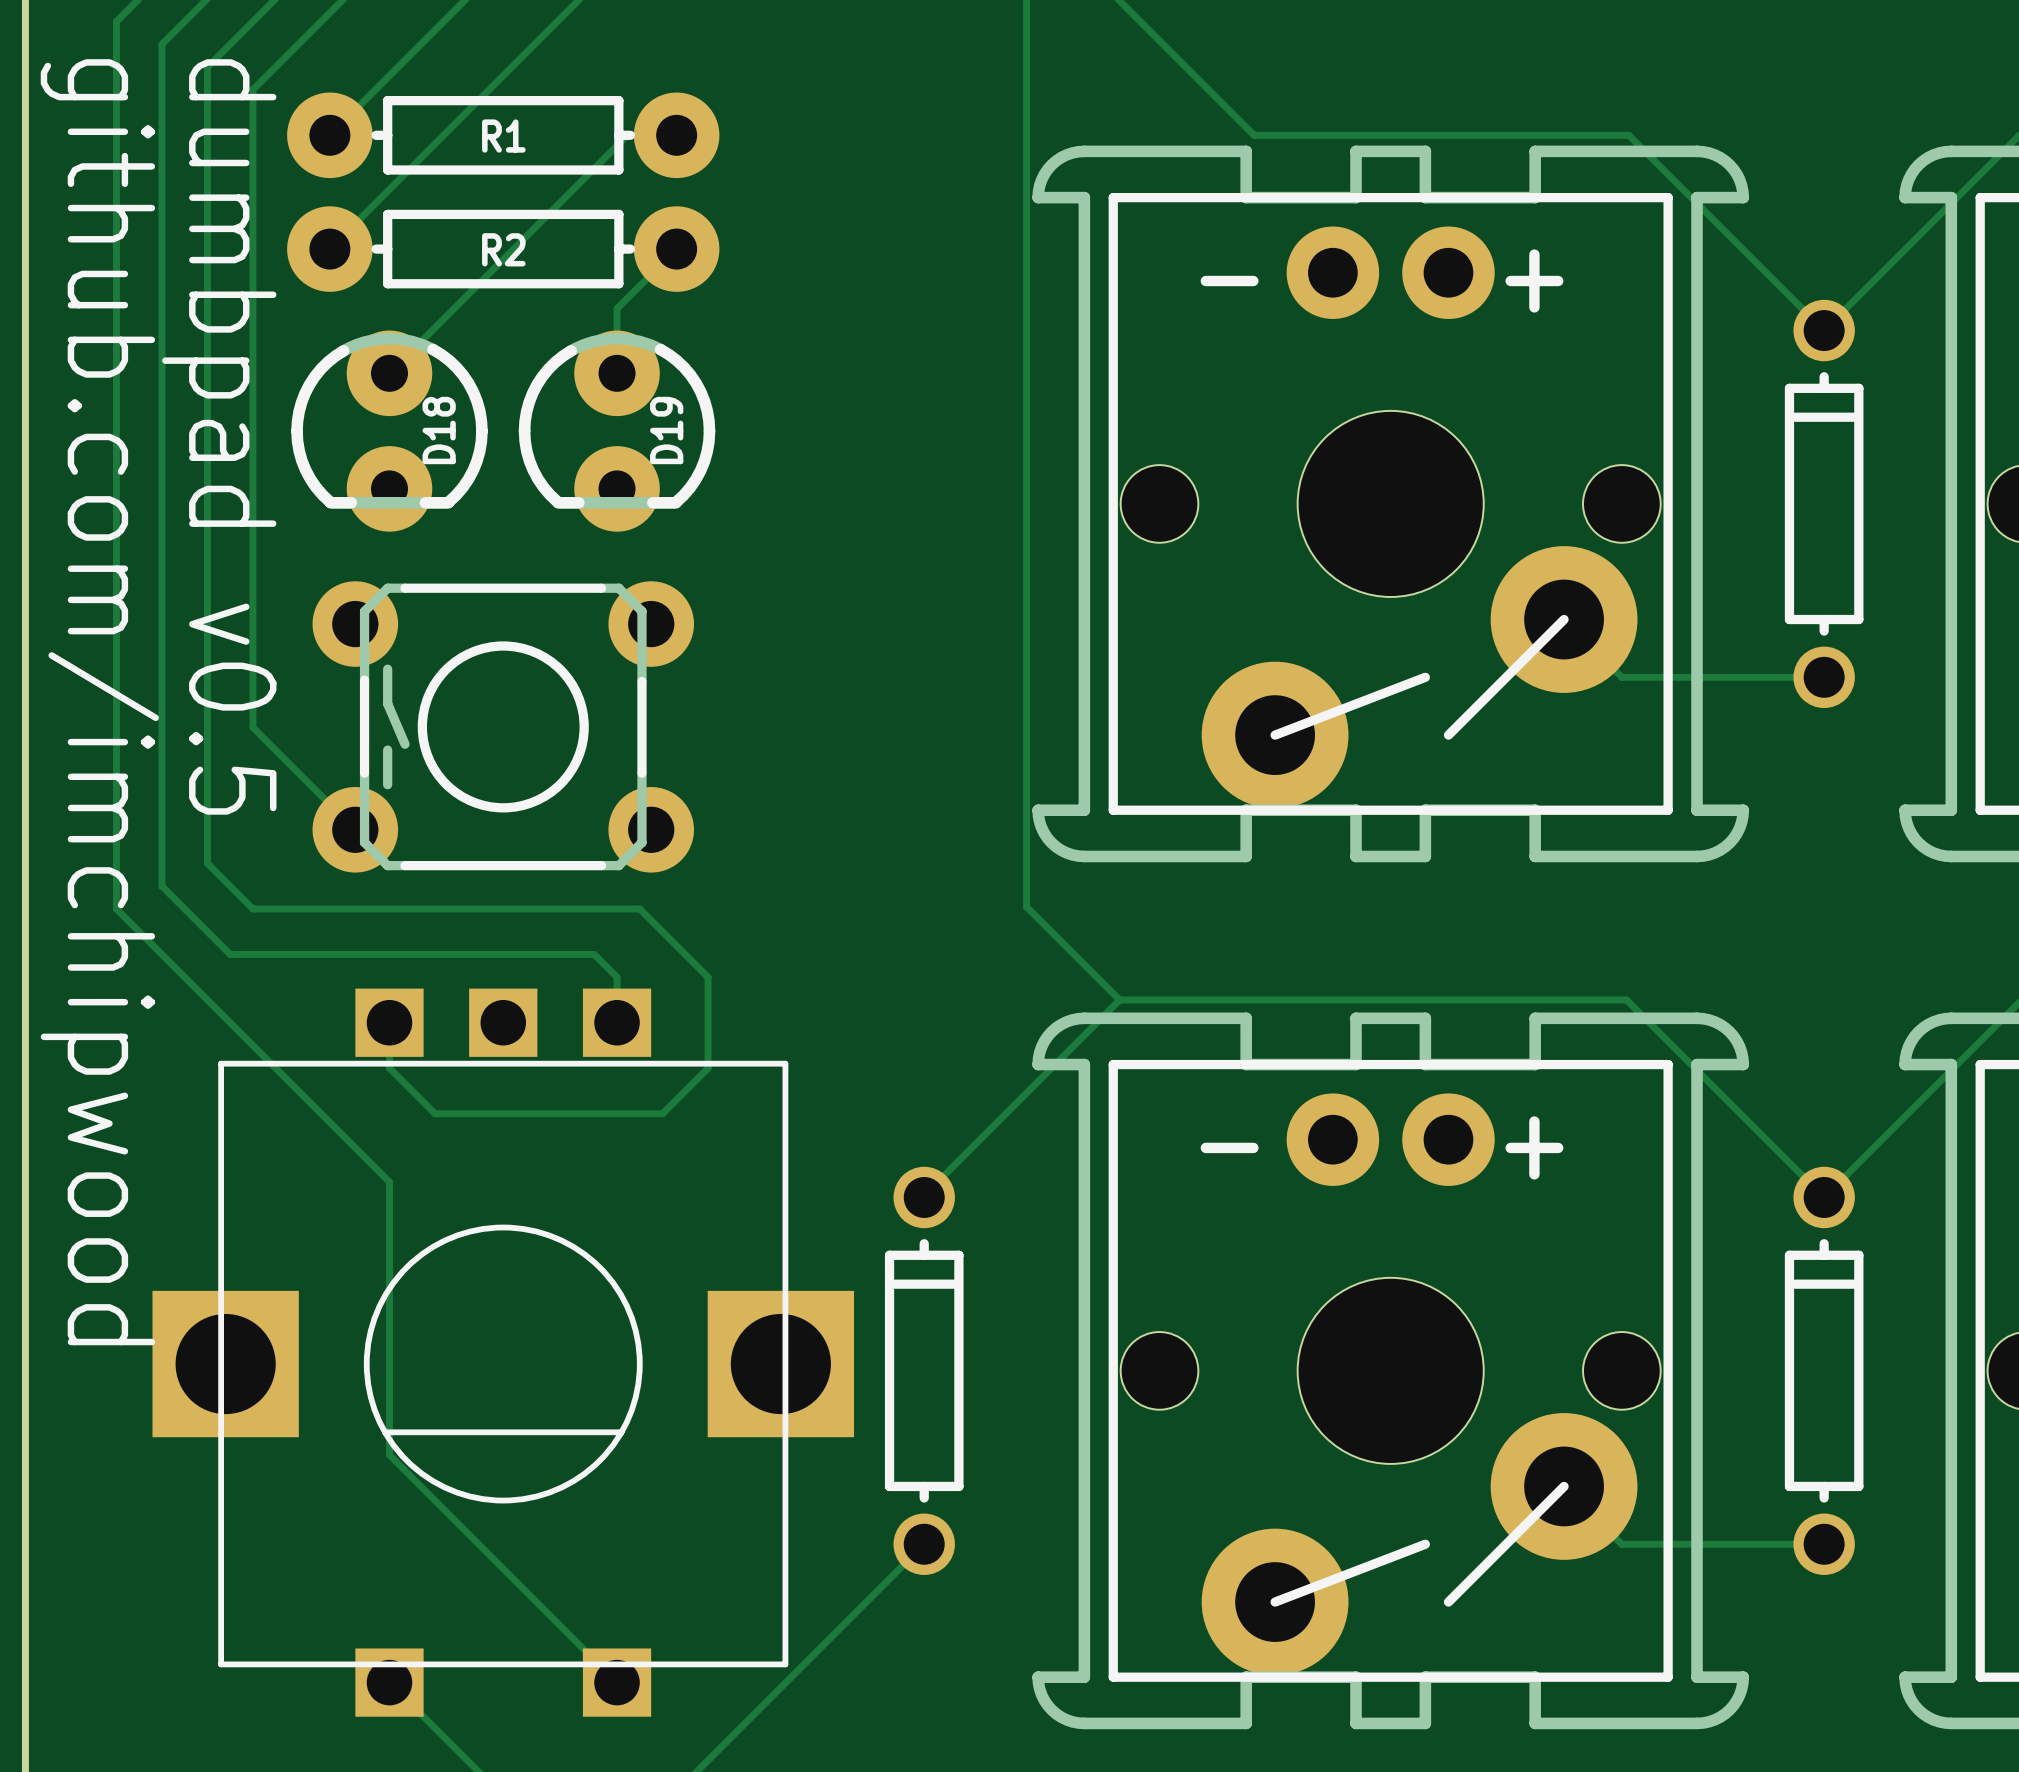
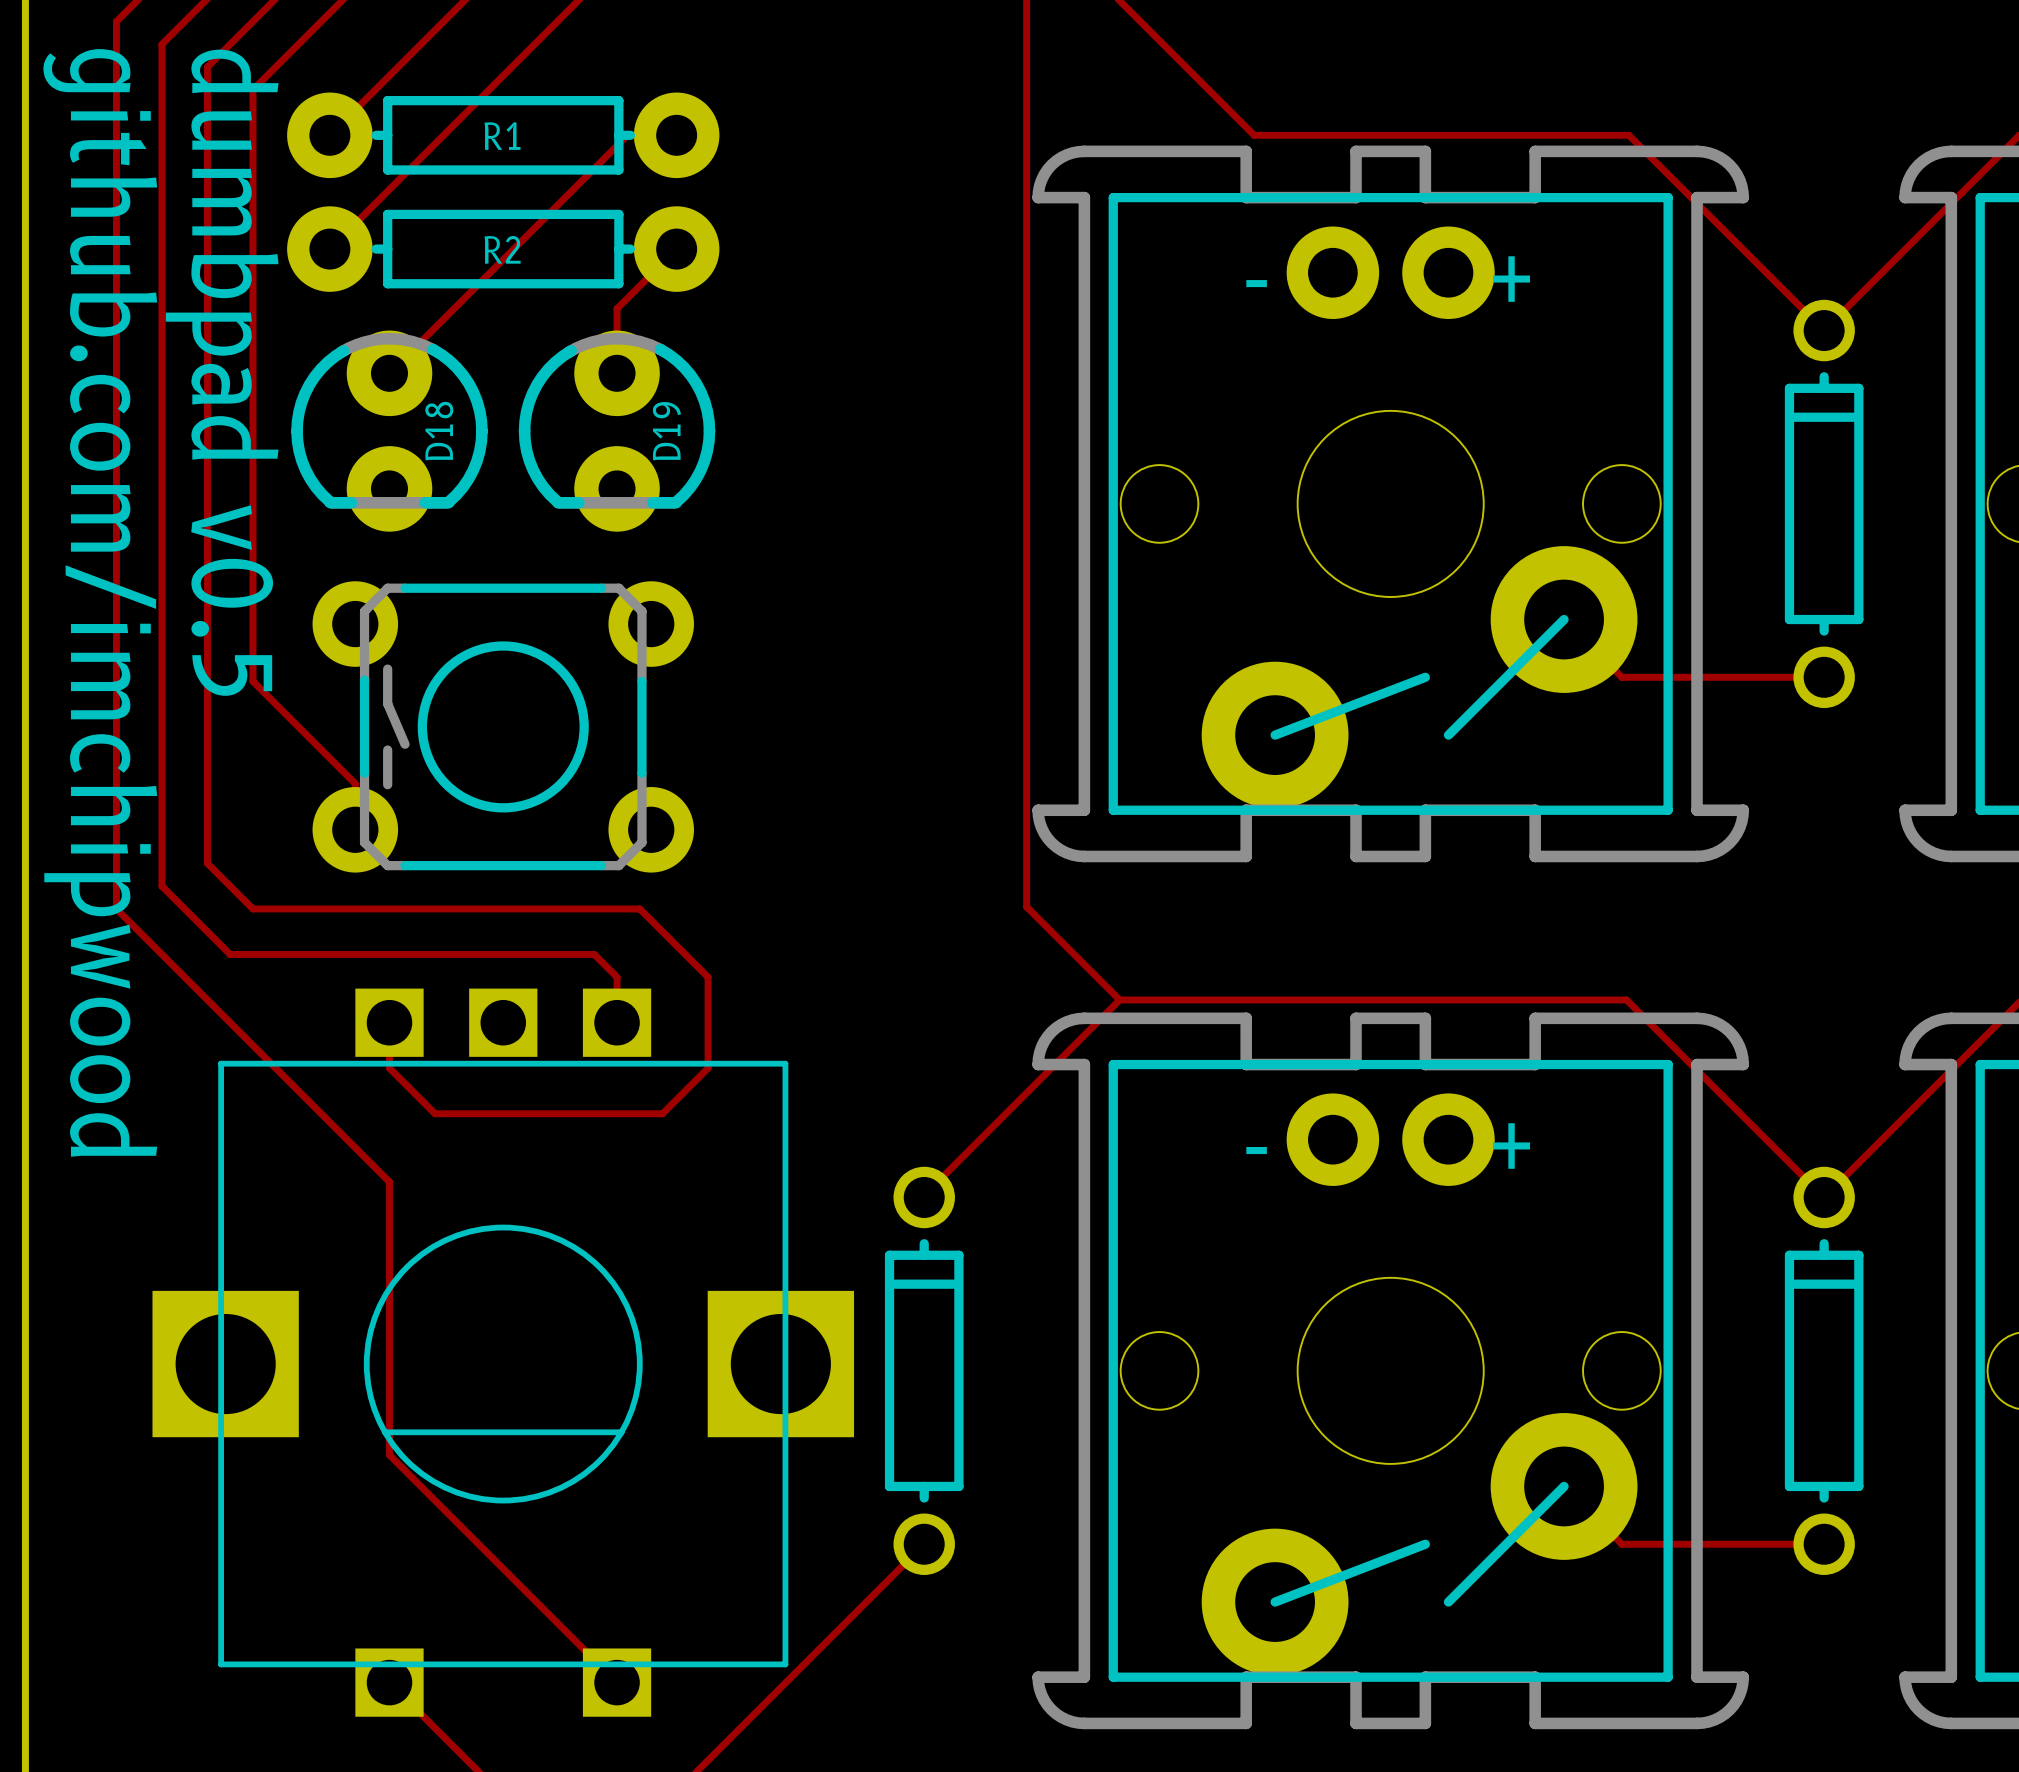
track: (252, 681) (252, 727) (355, 829) -> (252, 681) (355, 783) (355, 829)

